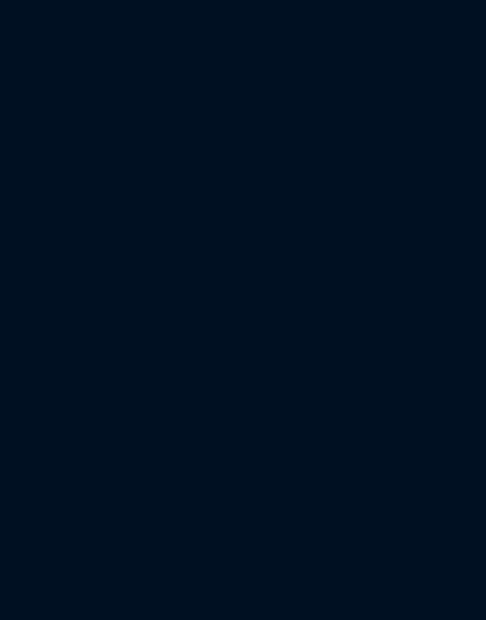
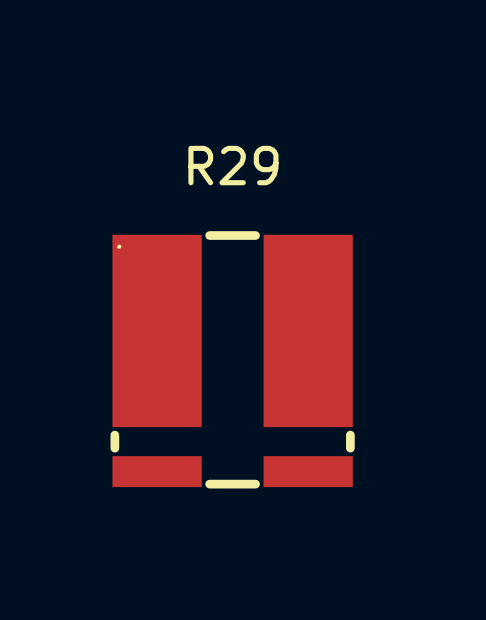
R29: none -> (232, 359)

